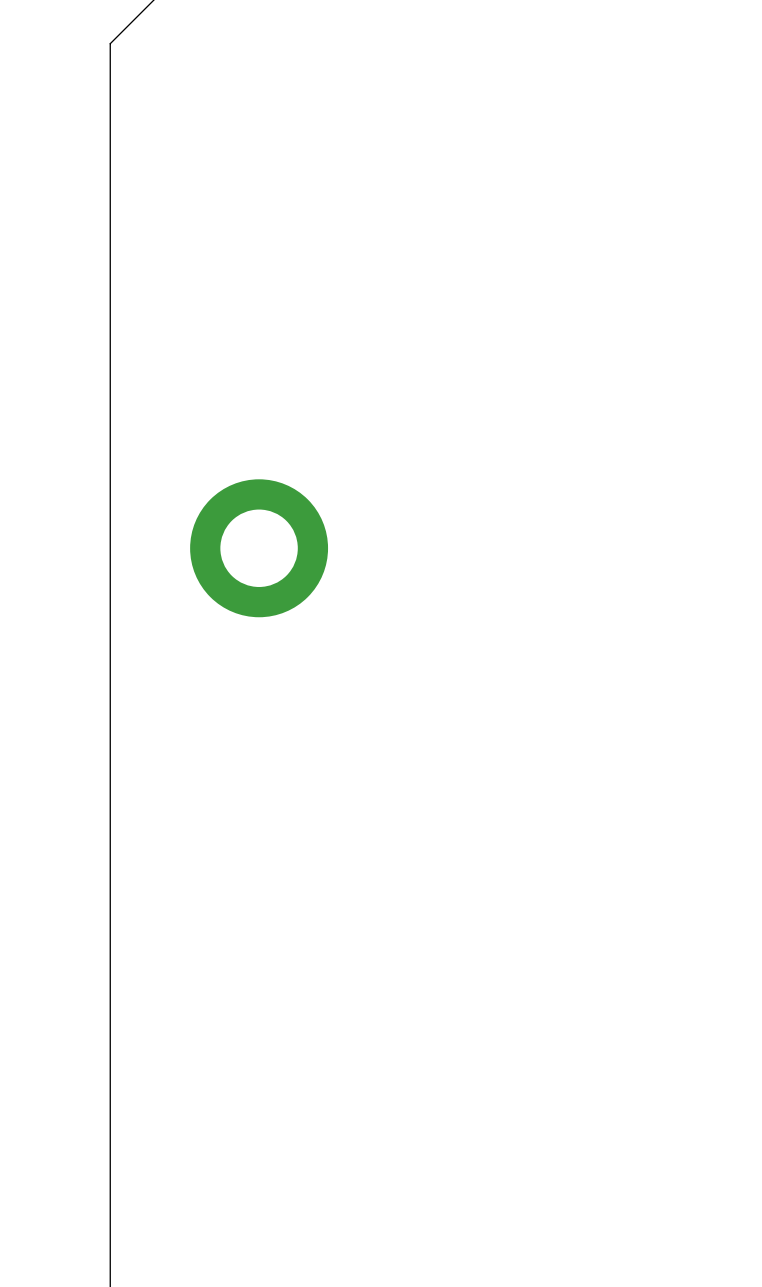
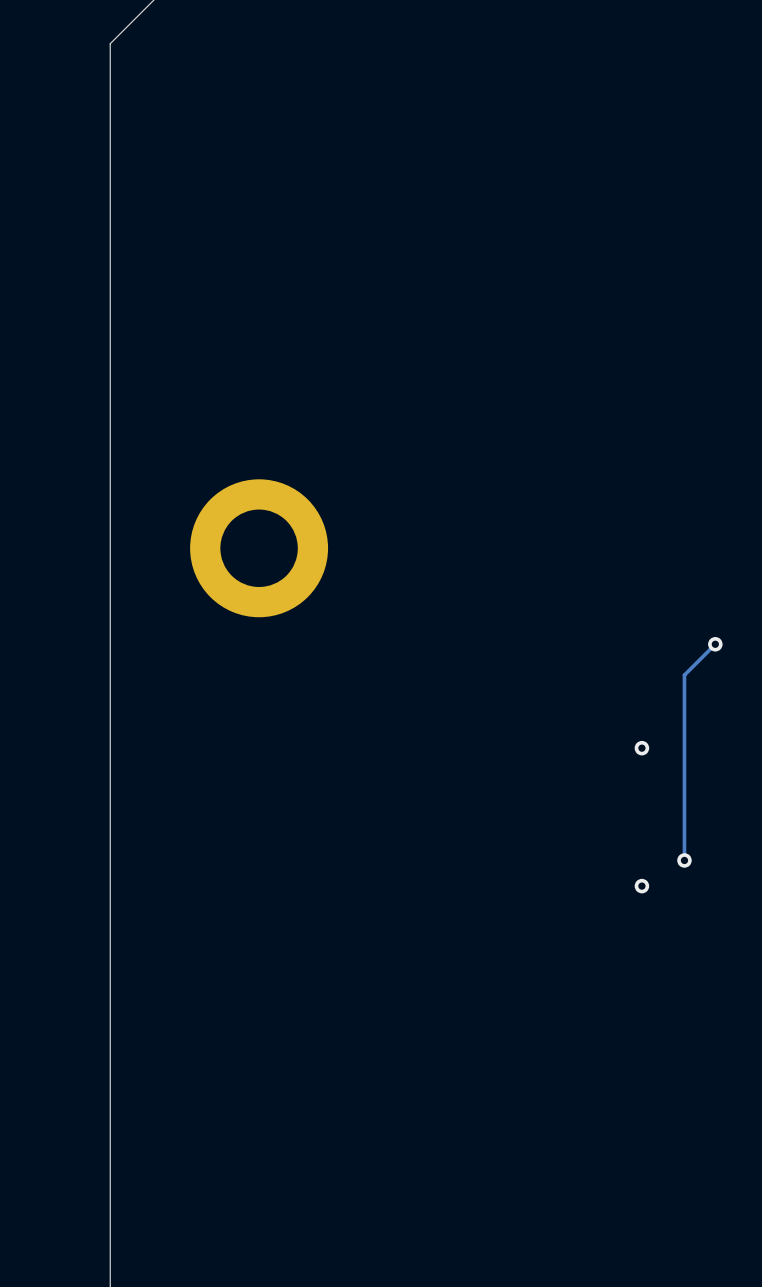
track: none -> (715, 644) (684, 675) (684, 860)
via: none -> (715, 644)
via: none -> (641, 748)
via: none -> (684, 860)
via: none -> (641, 886)

